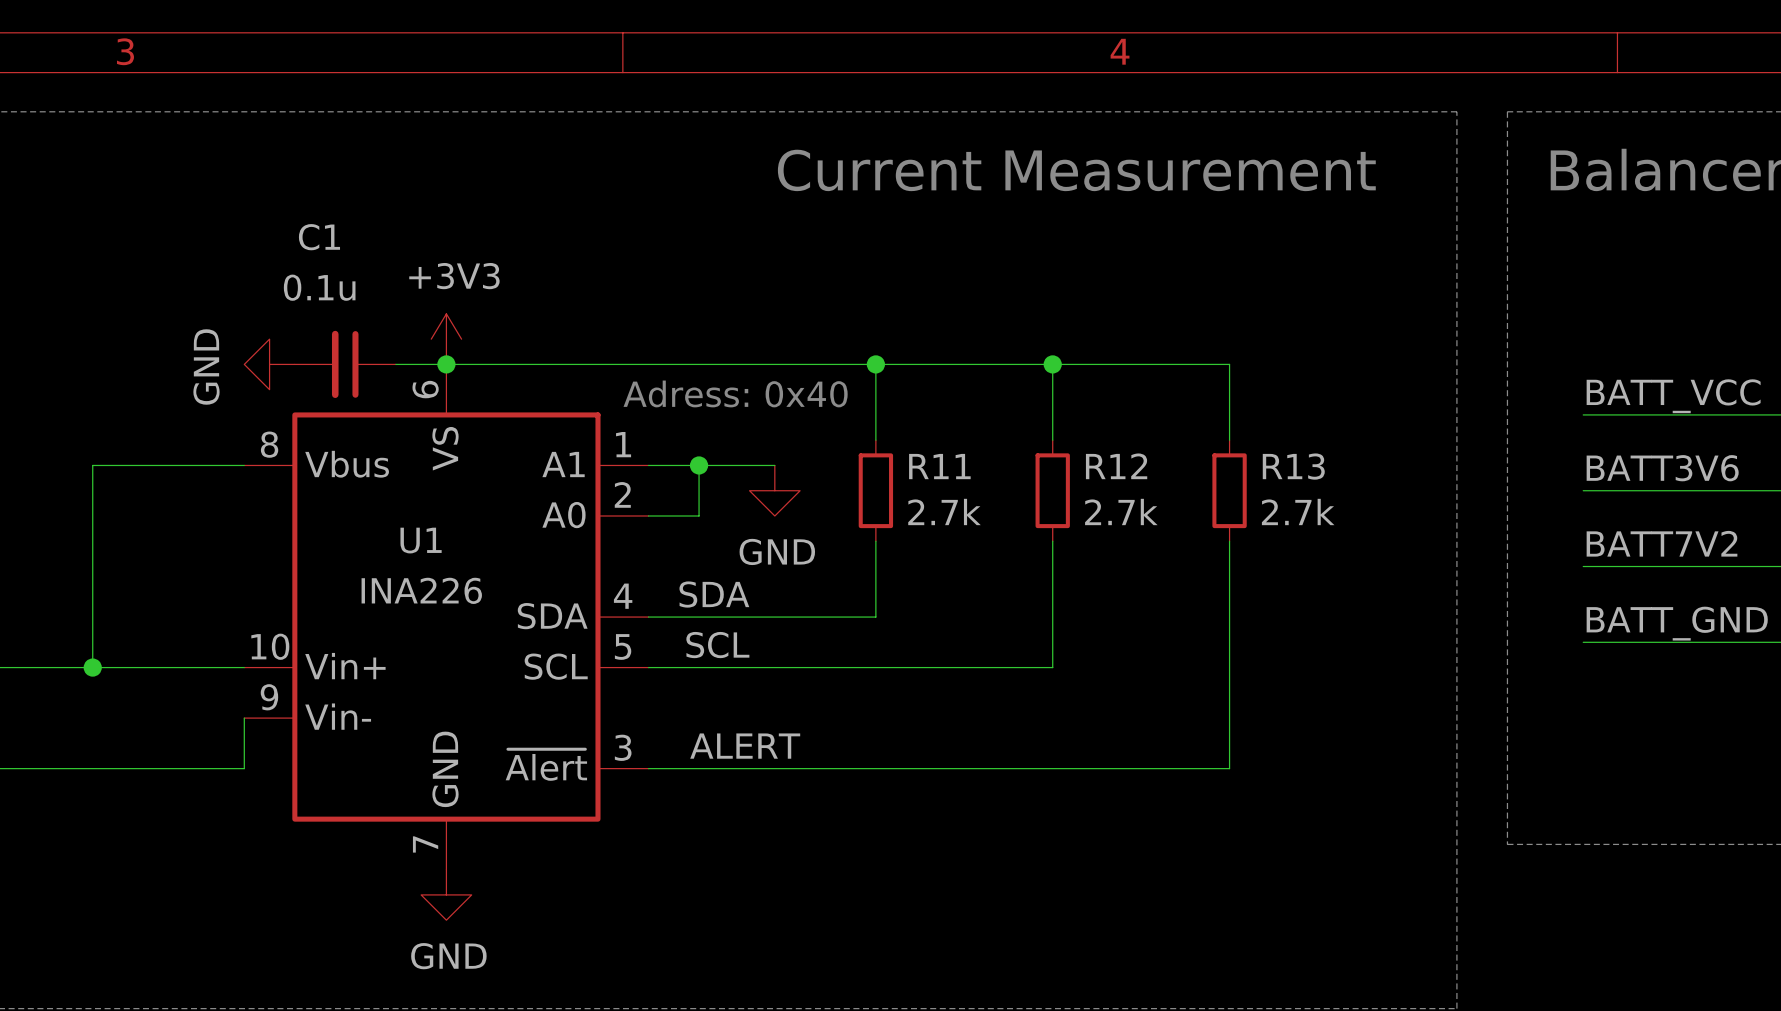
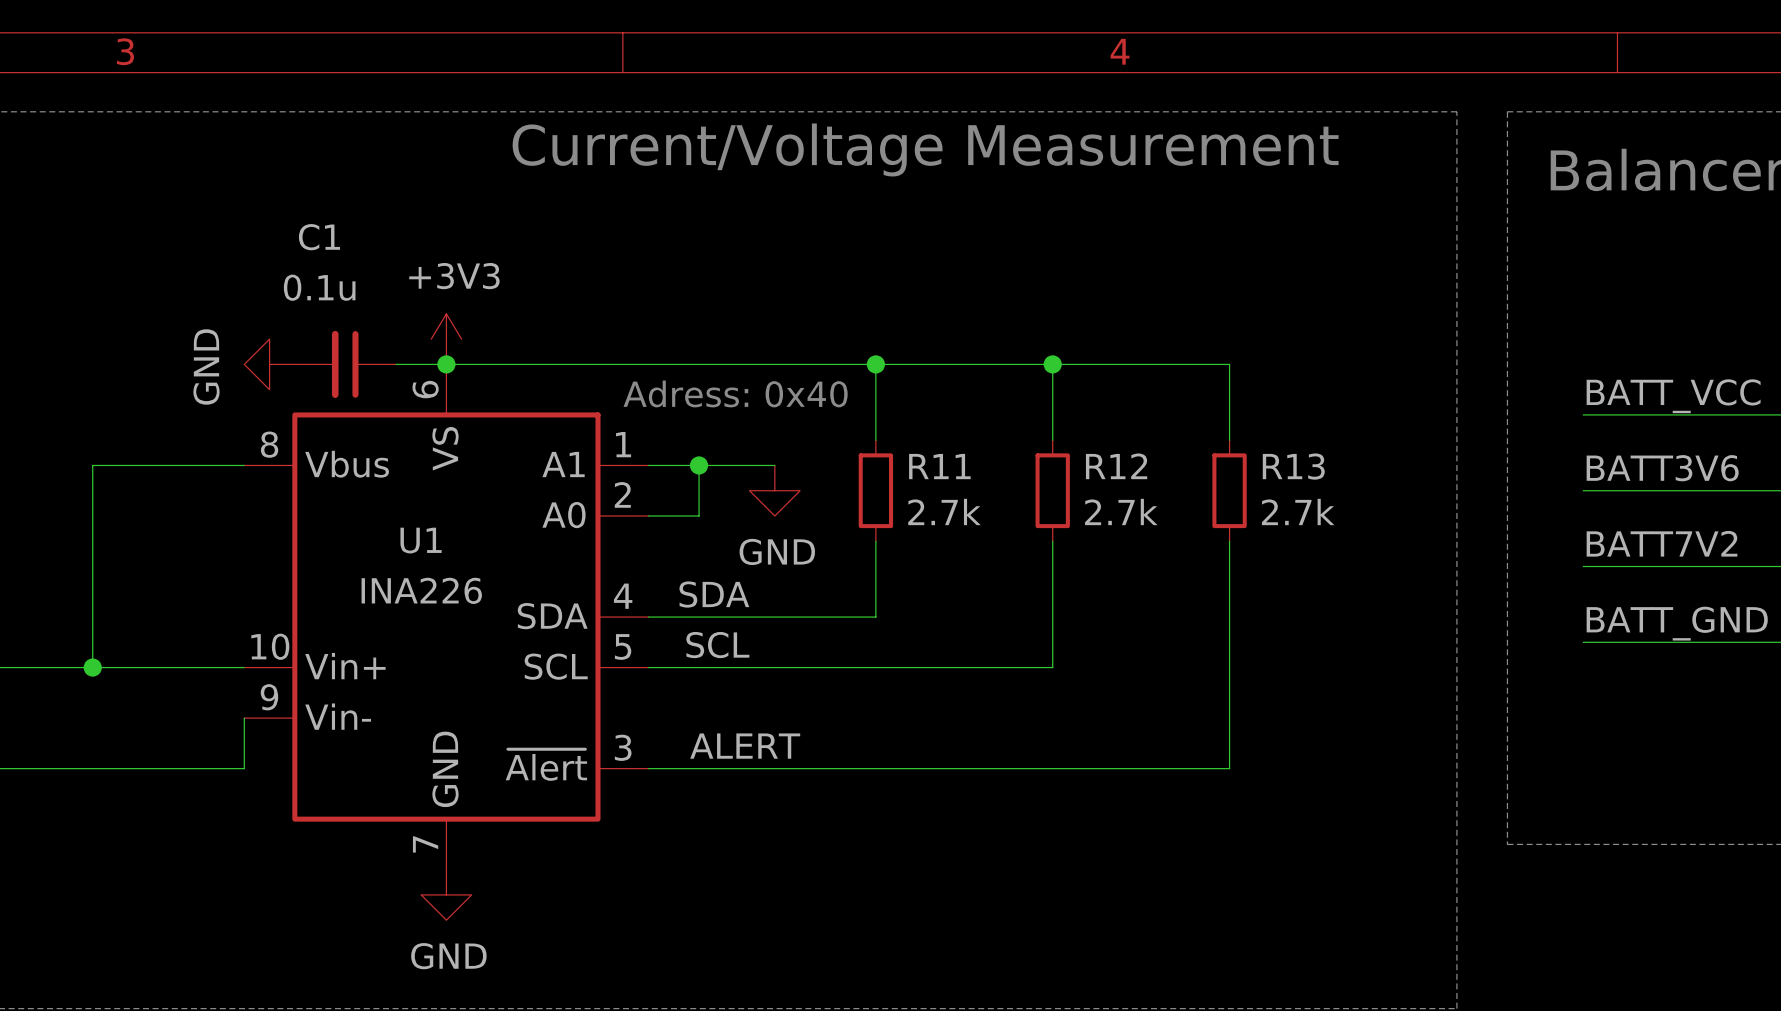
text: Current Measurement (1076, 170) -> Current/Voltage Measurement (925, 149)

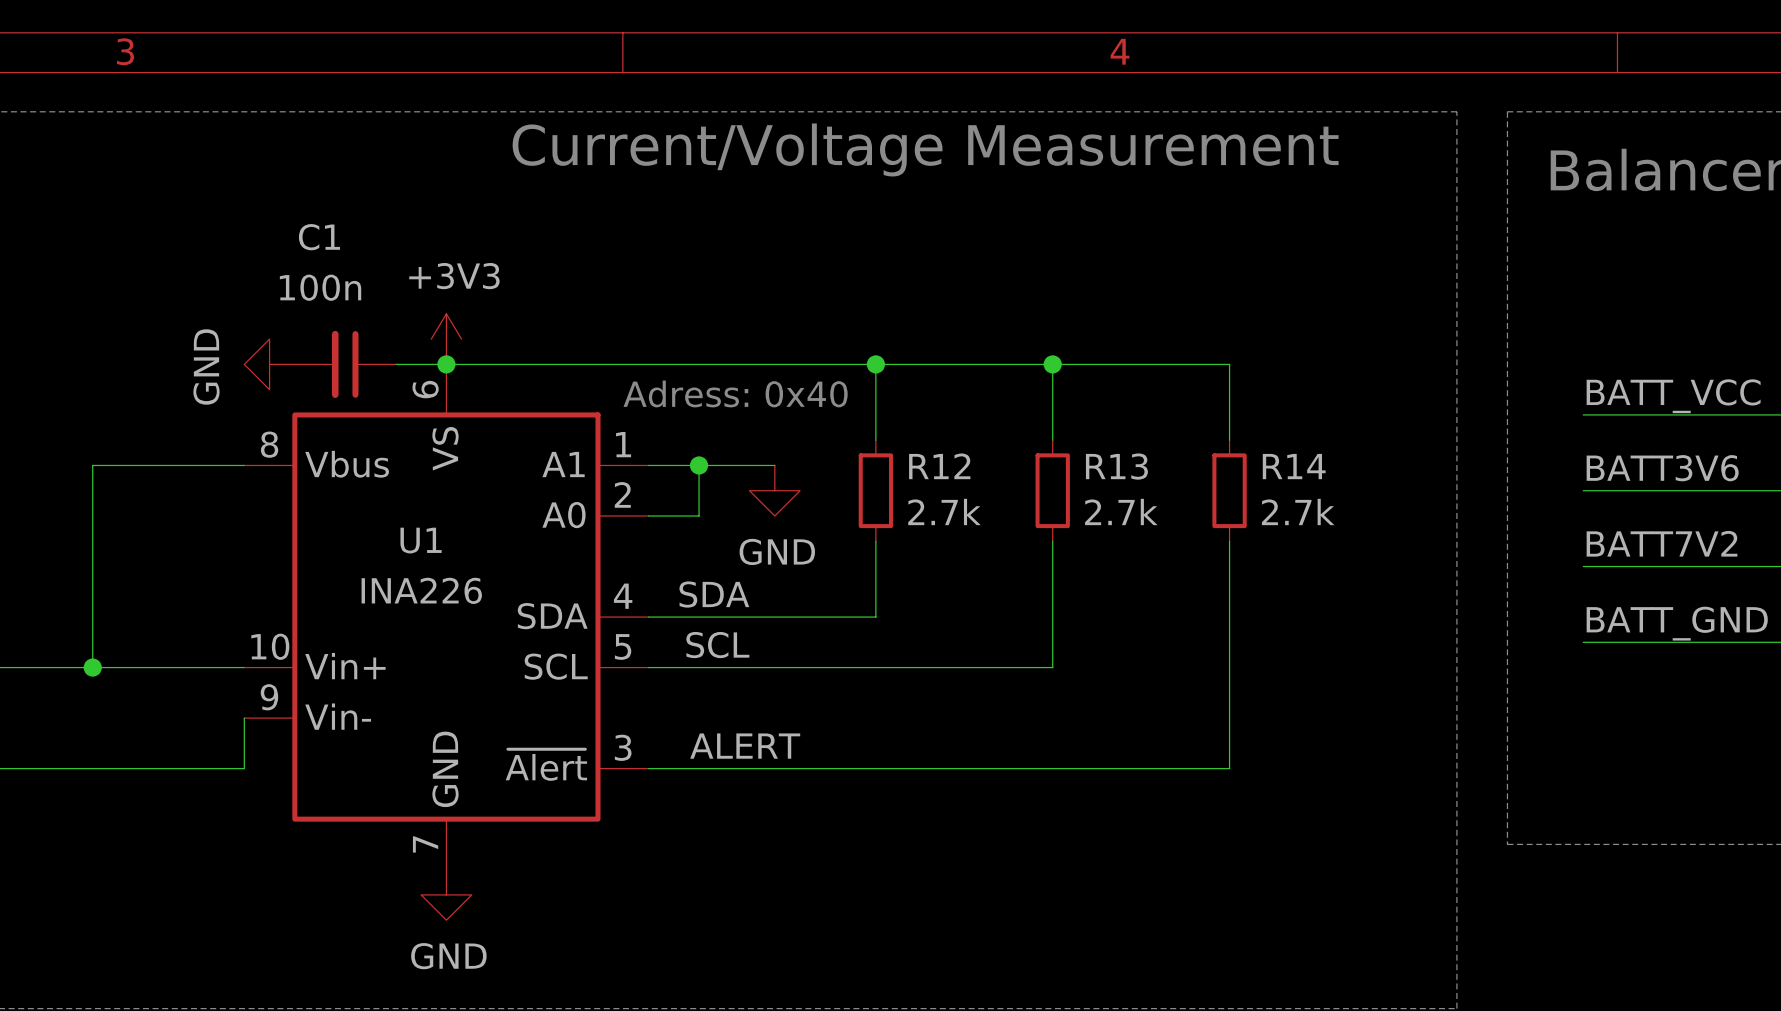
C1 value: 0.1u (319, 287) -> 100n (320, 287)
R11 name: R11 (939, 466) -> R12 (939, 466)
R12 name: R12 (1116, 466) -> R13 (1116, 466)
R13 name: R13 (1293, 466) -> R14 (1294, 466)

